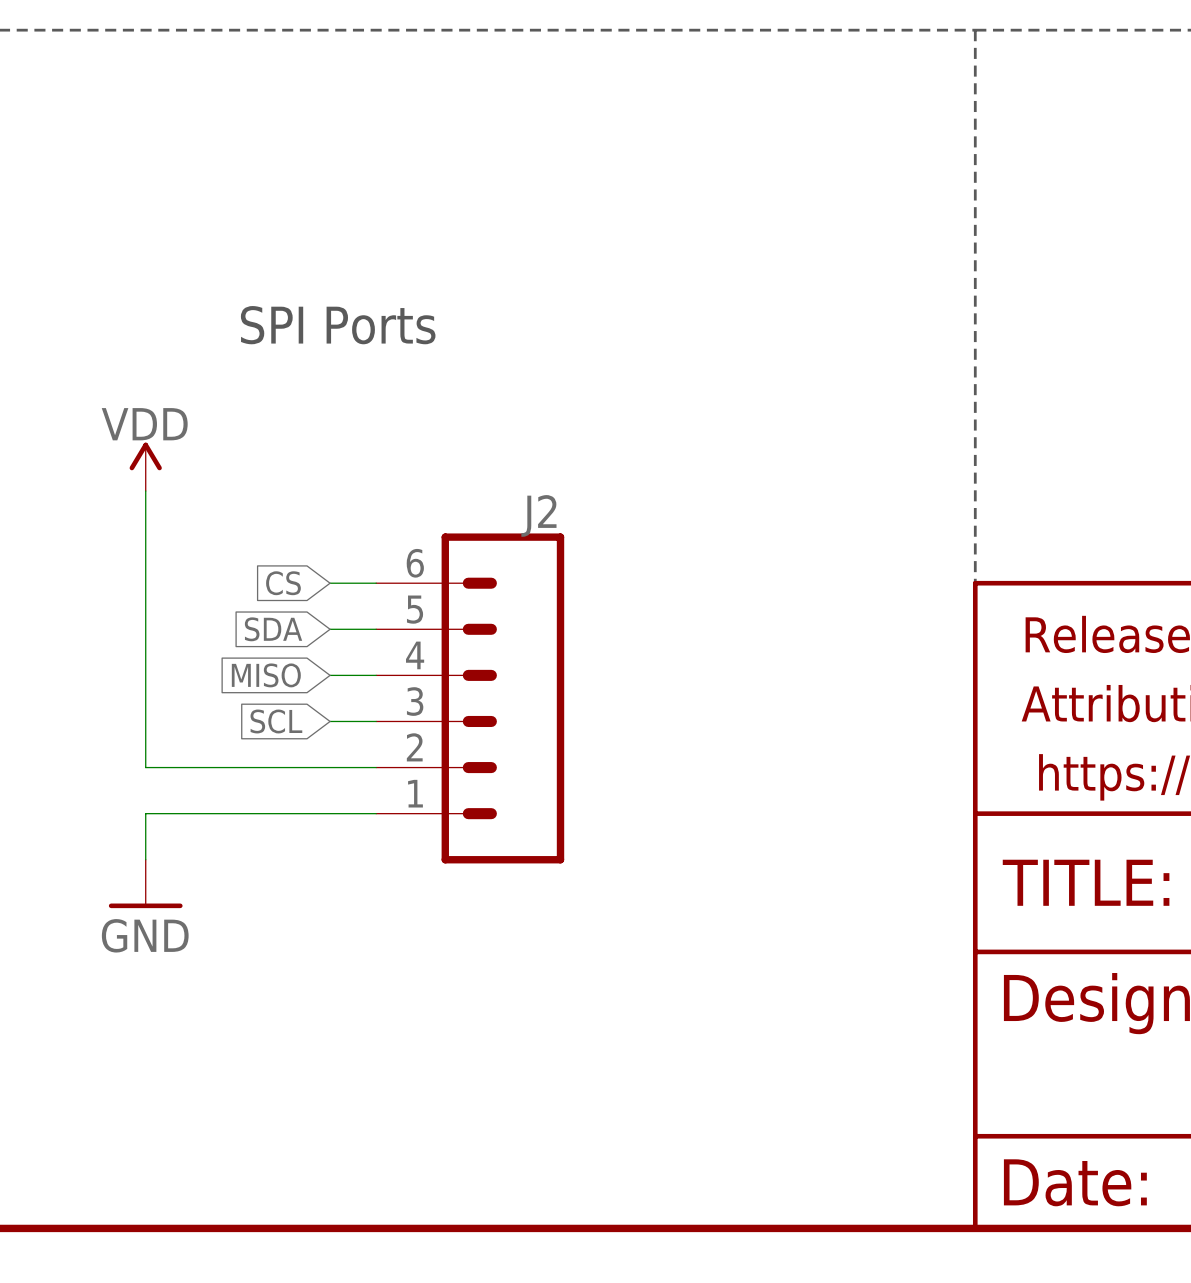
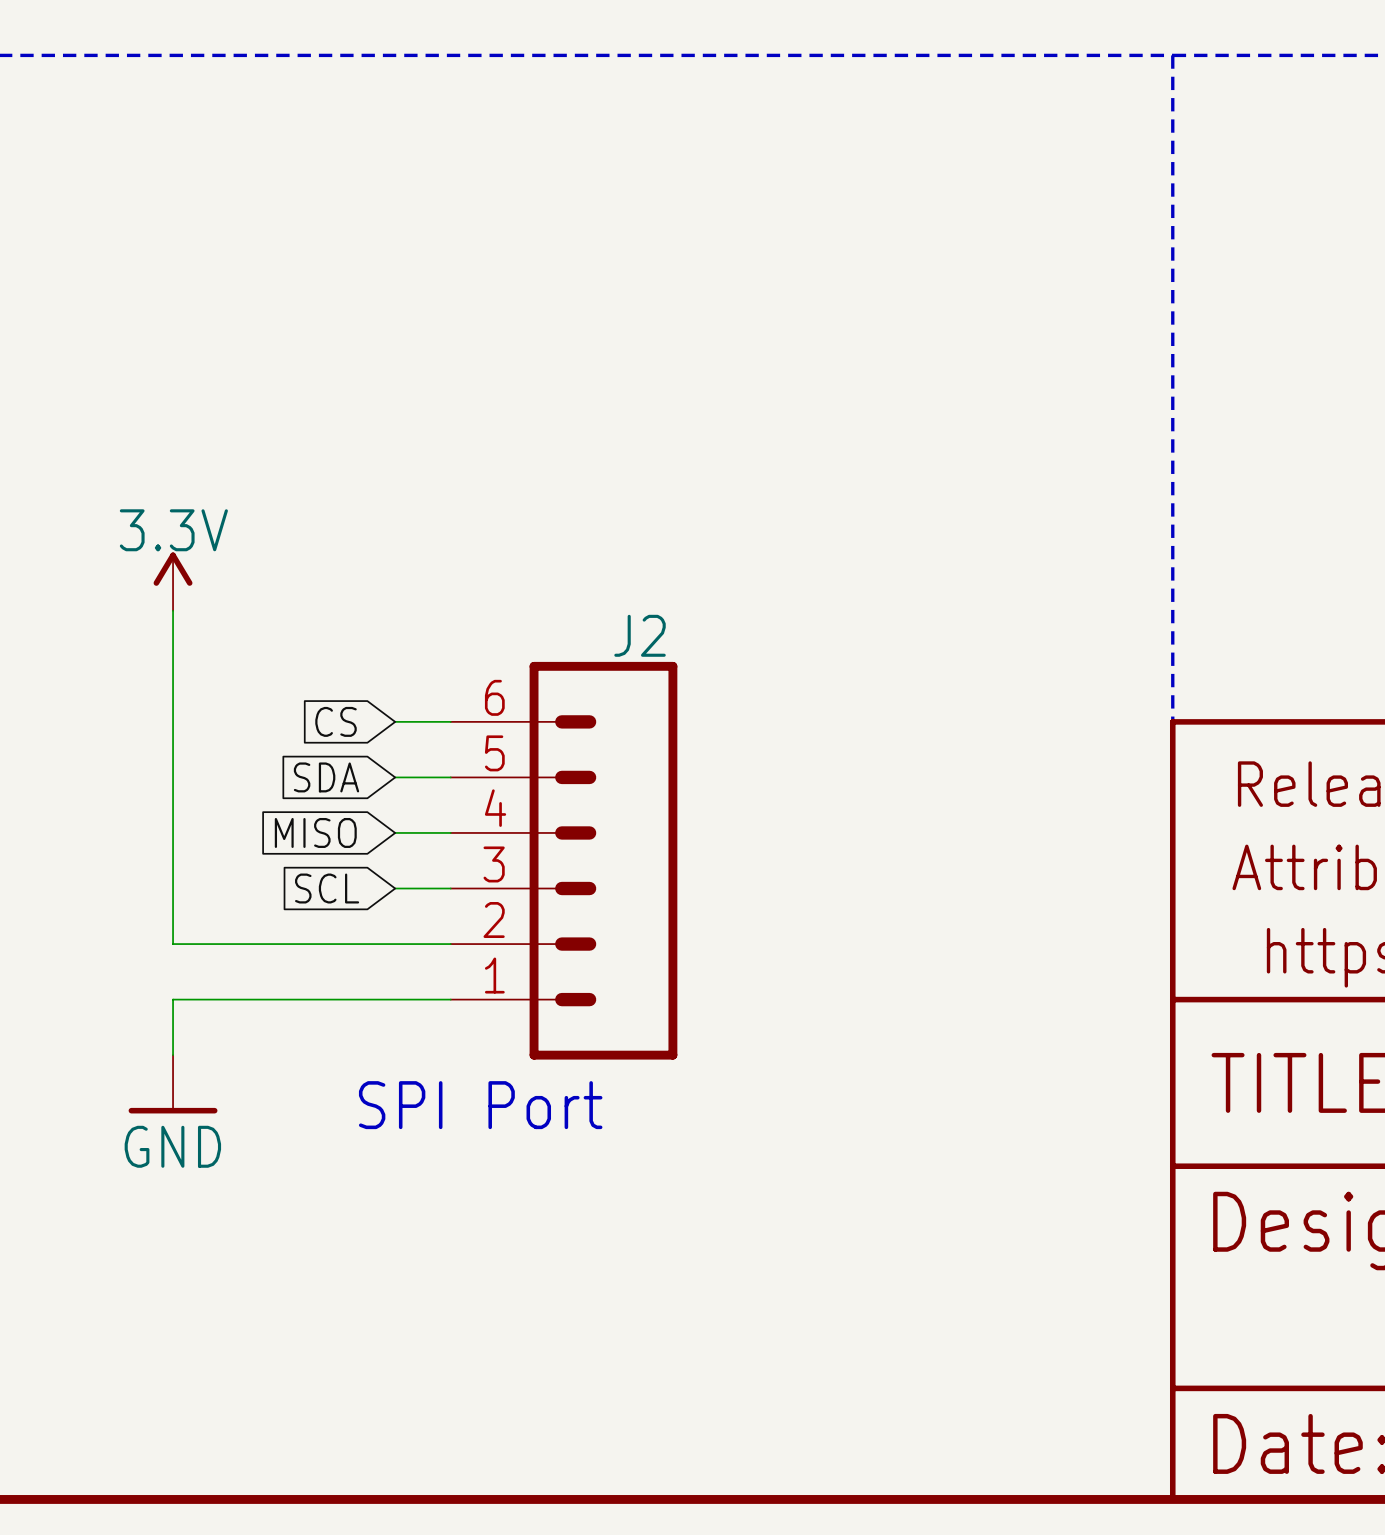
text: SPI Ports (338, 325) -> none
power symbol: VDD (145, 466) -> 3.3V (173, 581)
text: none -> SPI Port (480, 1105)

